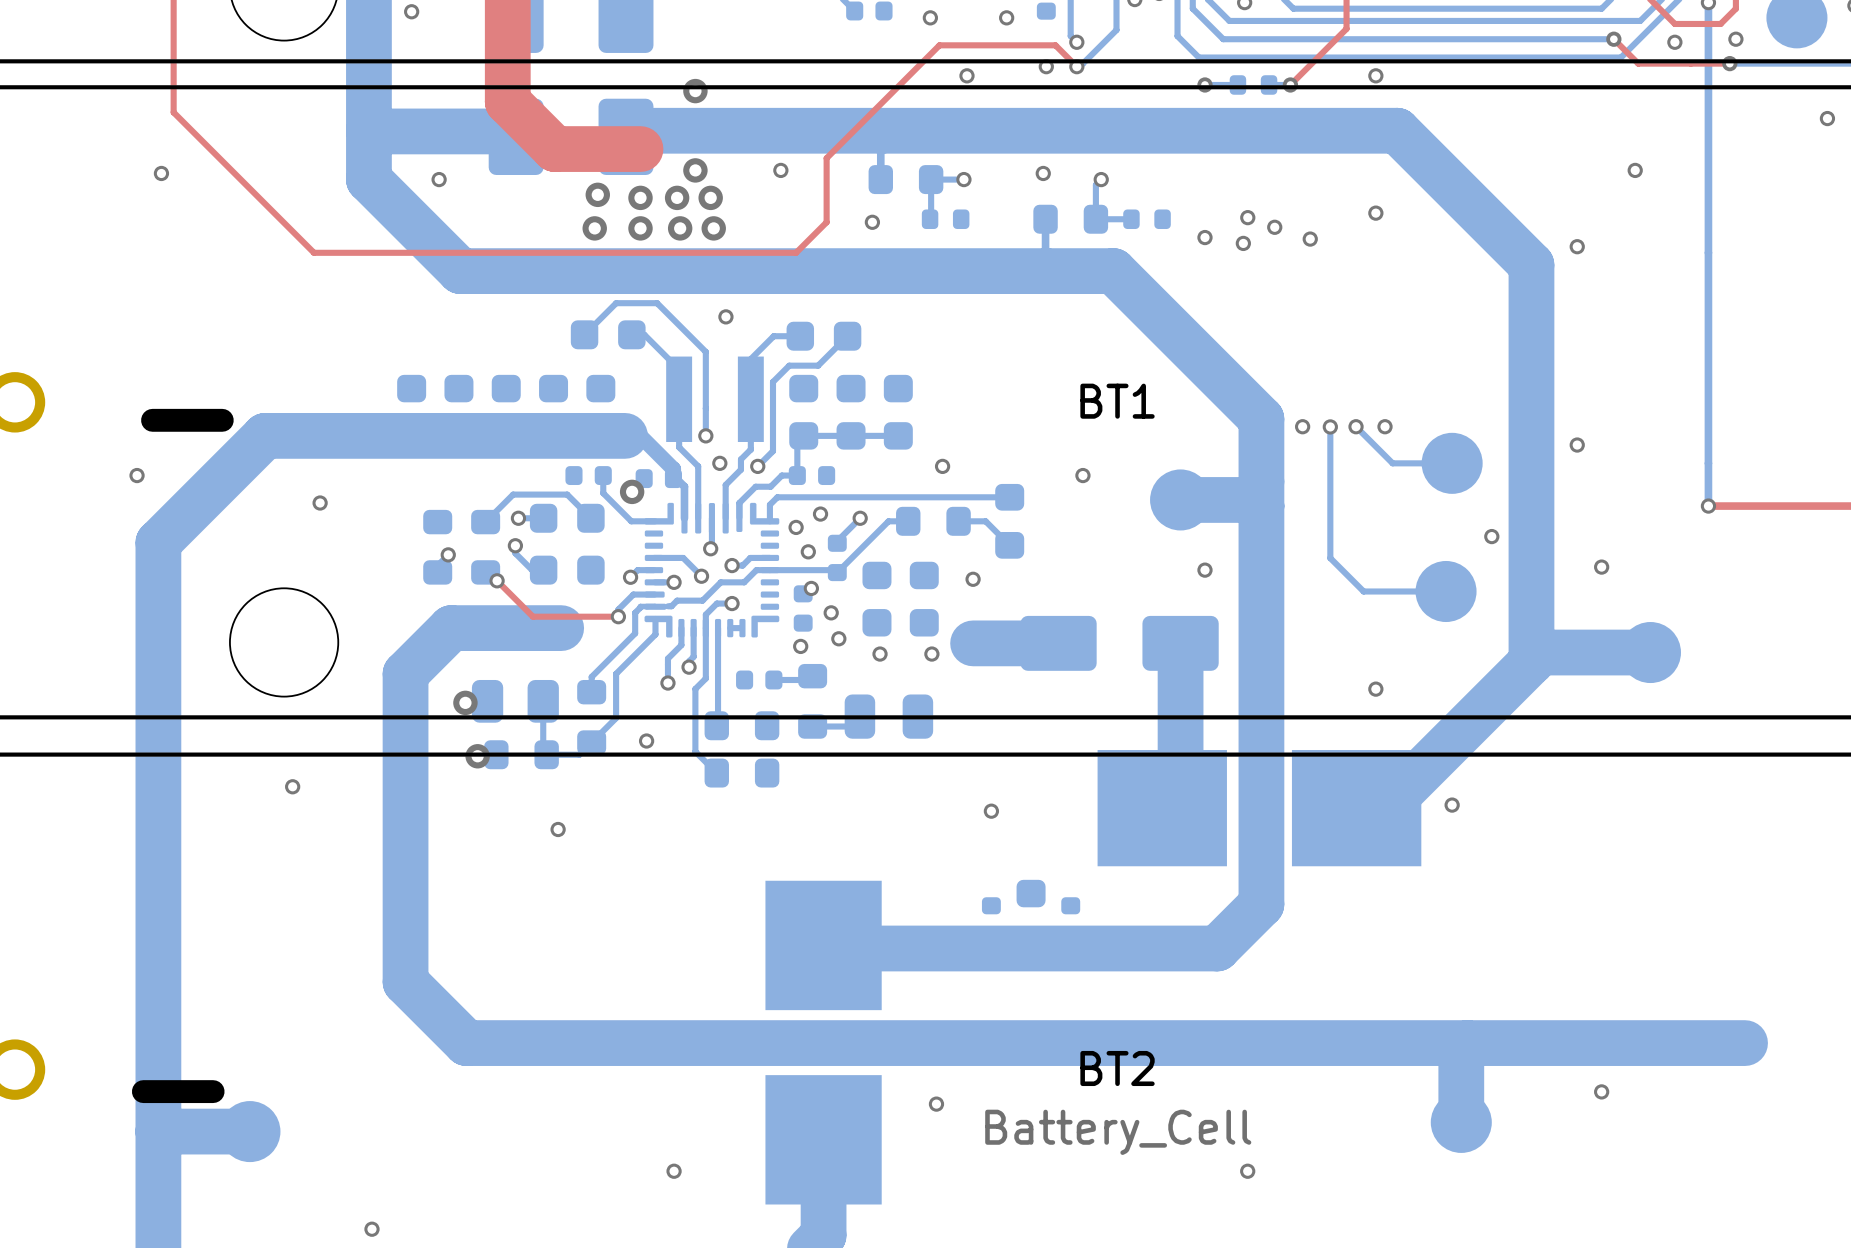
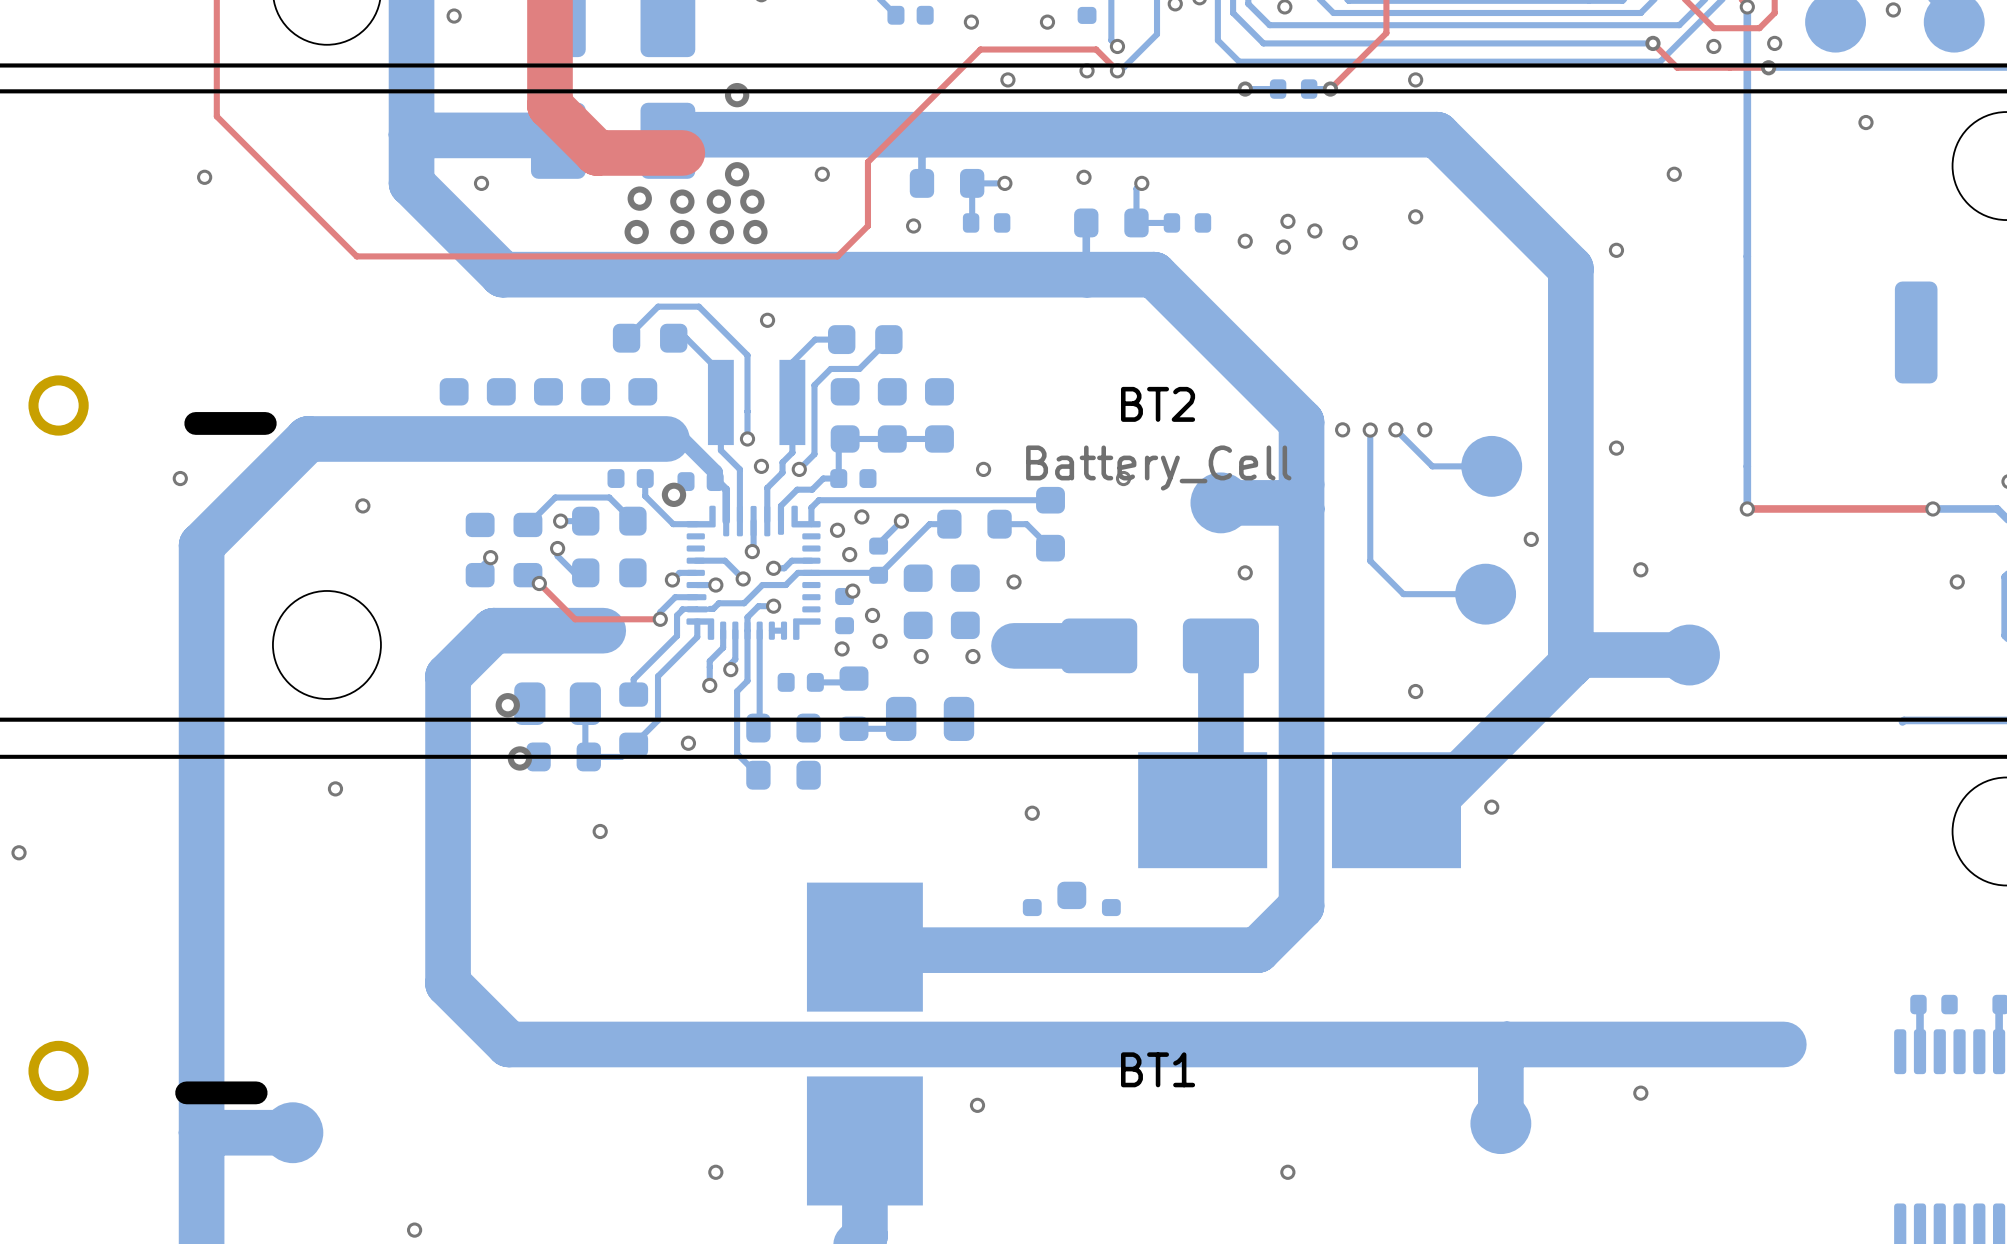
BT1 name: BT1 (1117, 401) -> BT2 (1158, 404)
BT1 value: none -> Battery_Cell (1158, 468)
BT2 name: BT2 (1117, 1068) -> BT1 (1158, 1069)
BT2 value: Battery_Cell (1118, 1132) -> none

